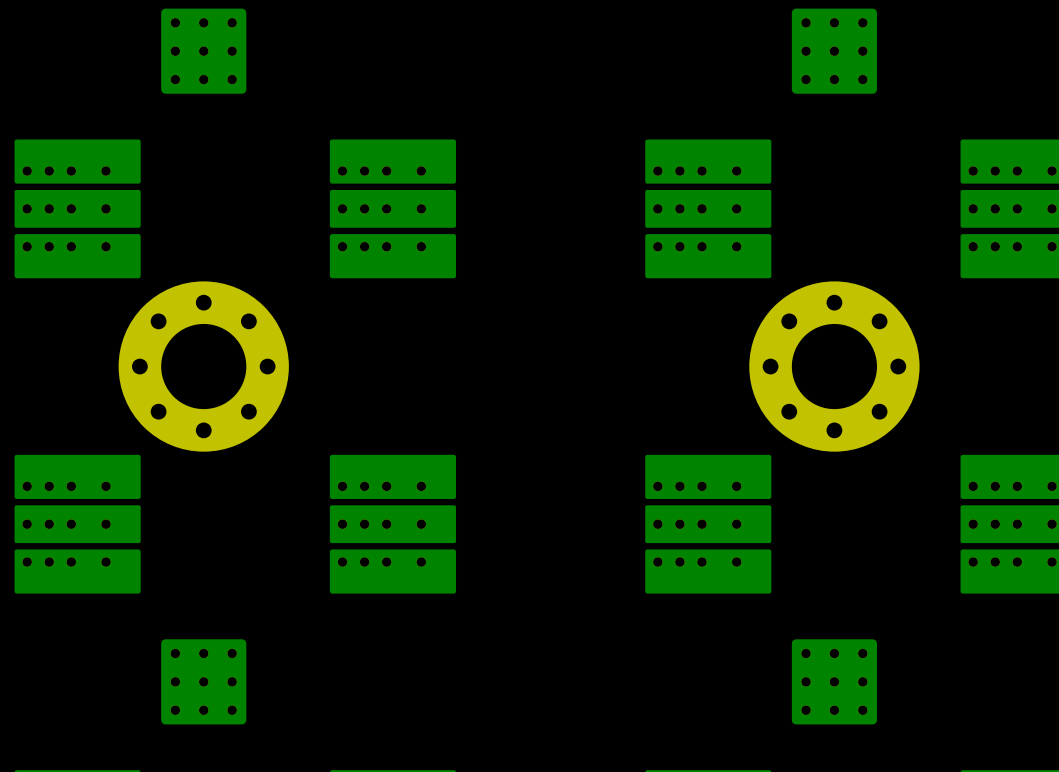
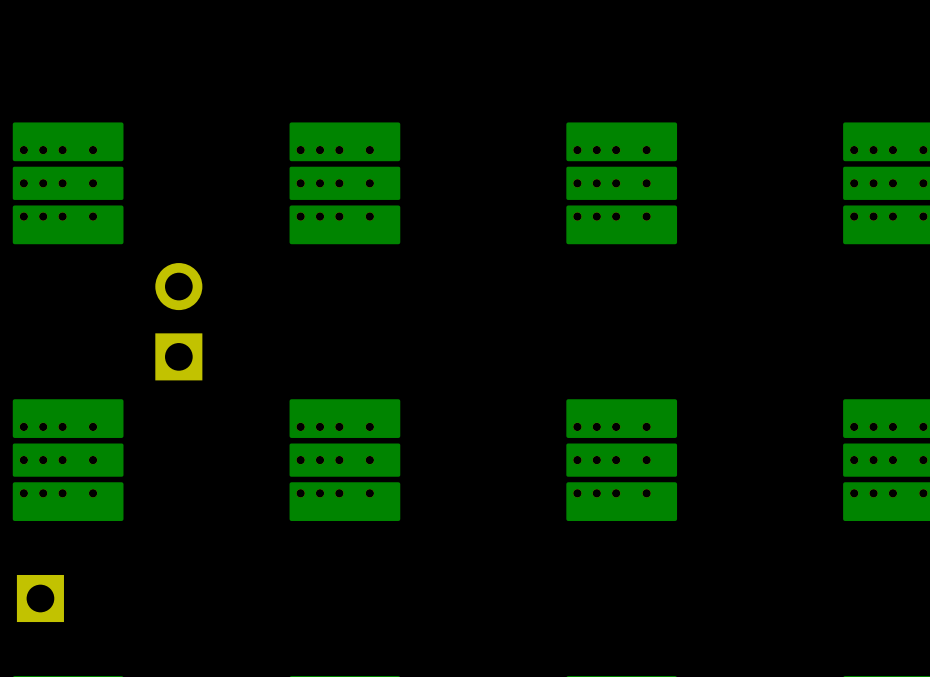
part: (203, 51) -> none
part: (834, 51) -> none
part footprint: [118, 281, 289, 452] -> [155, 263, 203, 381]
part: (834, 366) -> none
part: none -> (40, 598)
part: (203, 681) -> none
part: (834, 681) -> none

